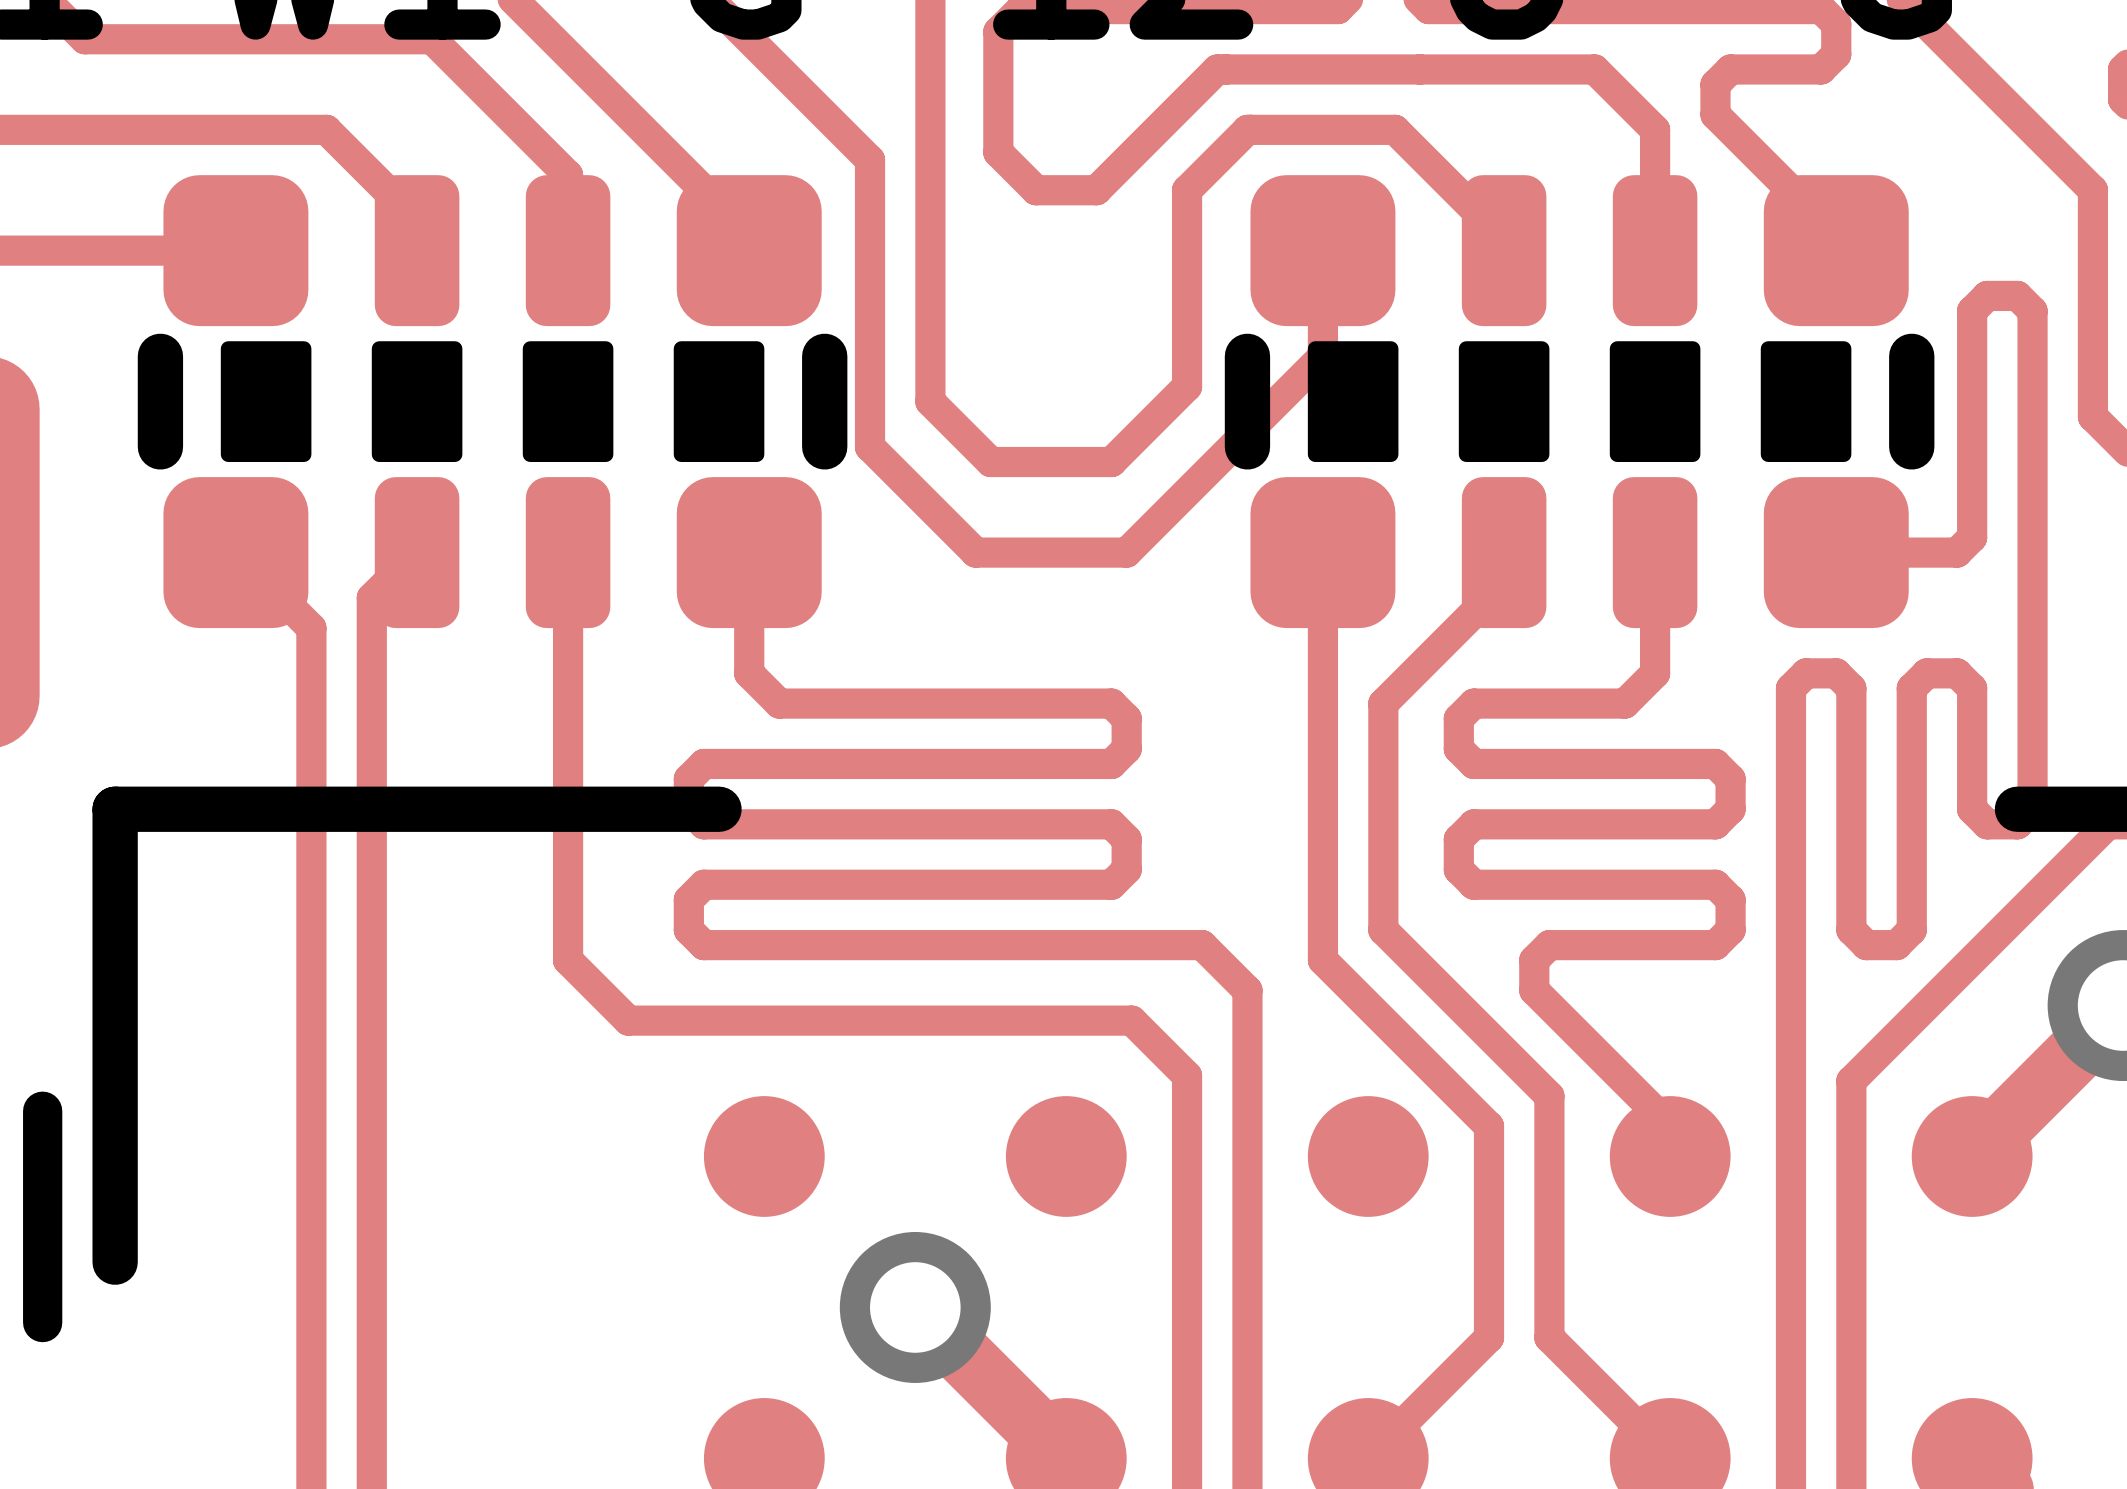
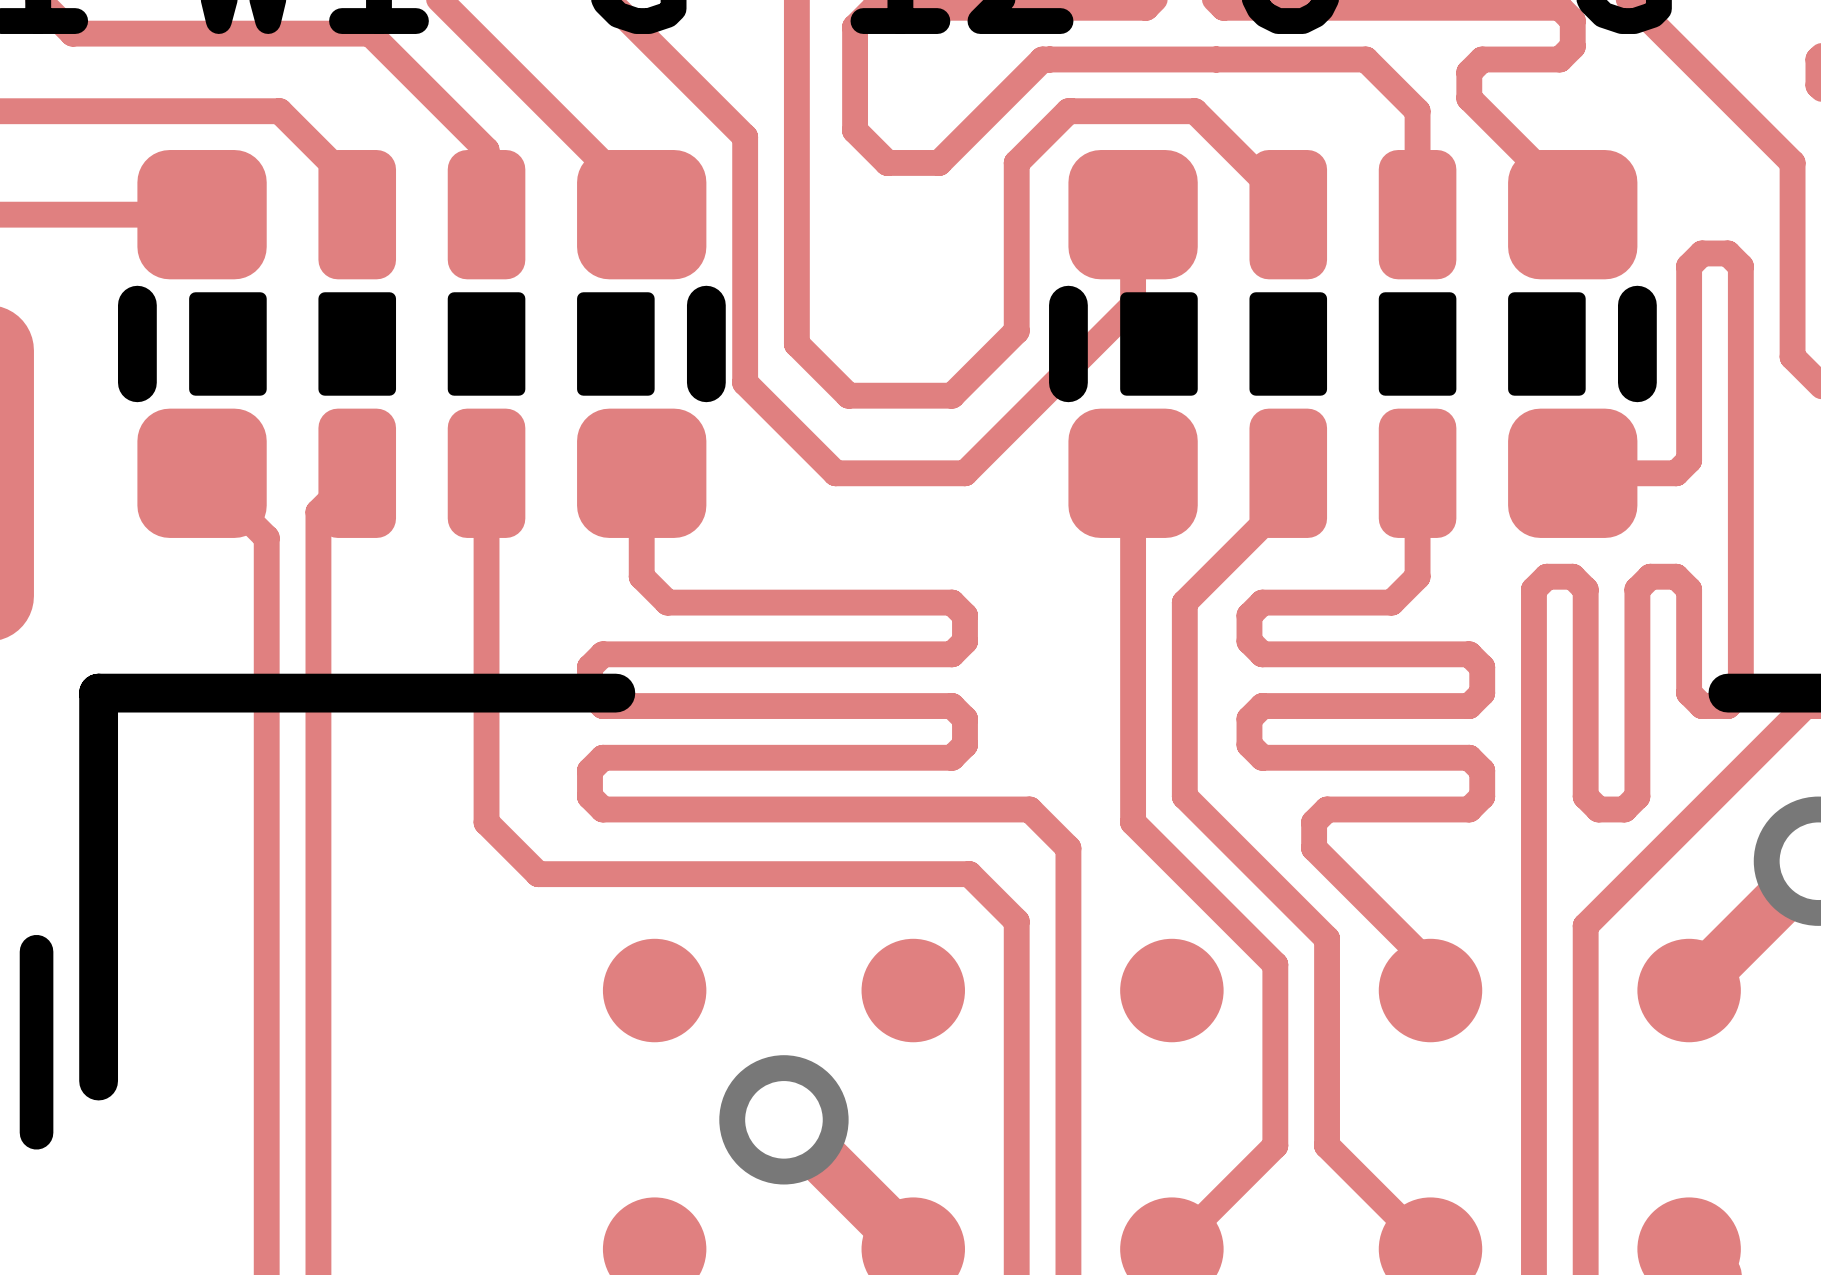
part footprint: [137, 175, 848, 629] -> [118, 150, 726, 538]
part footprint: [1224, 175, 1935, 629] -> [1049, 150, 1657, 538]

